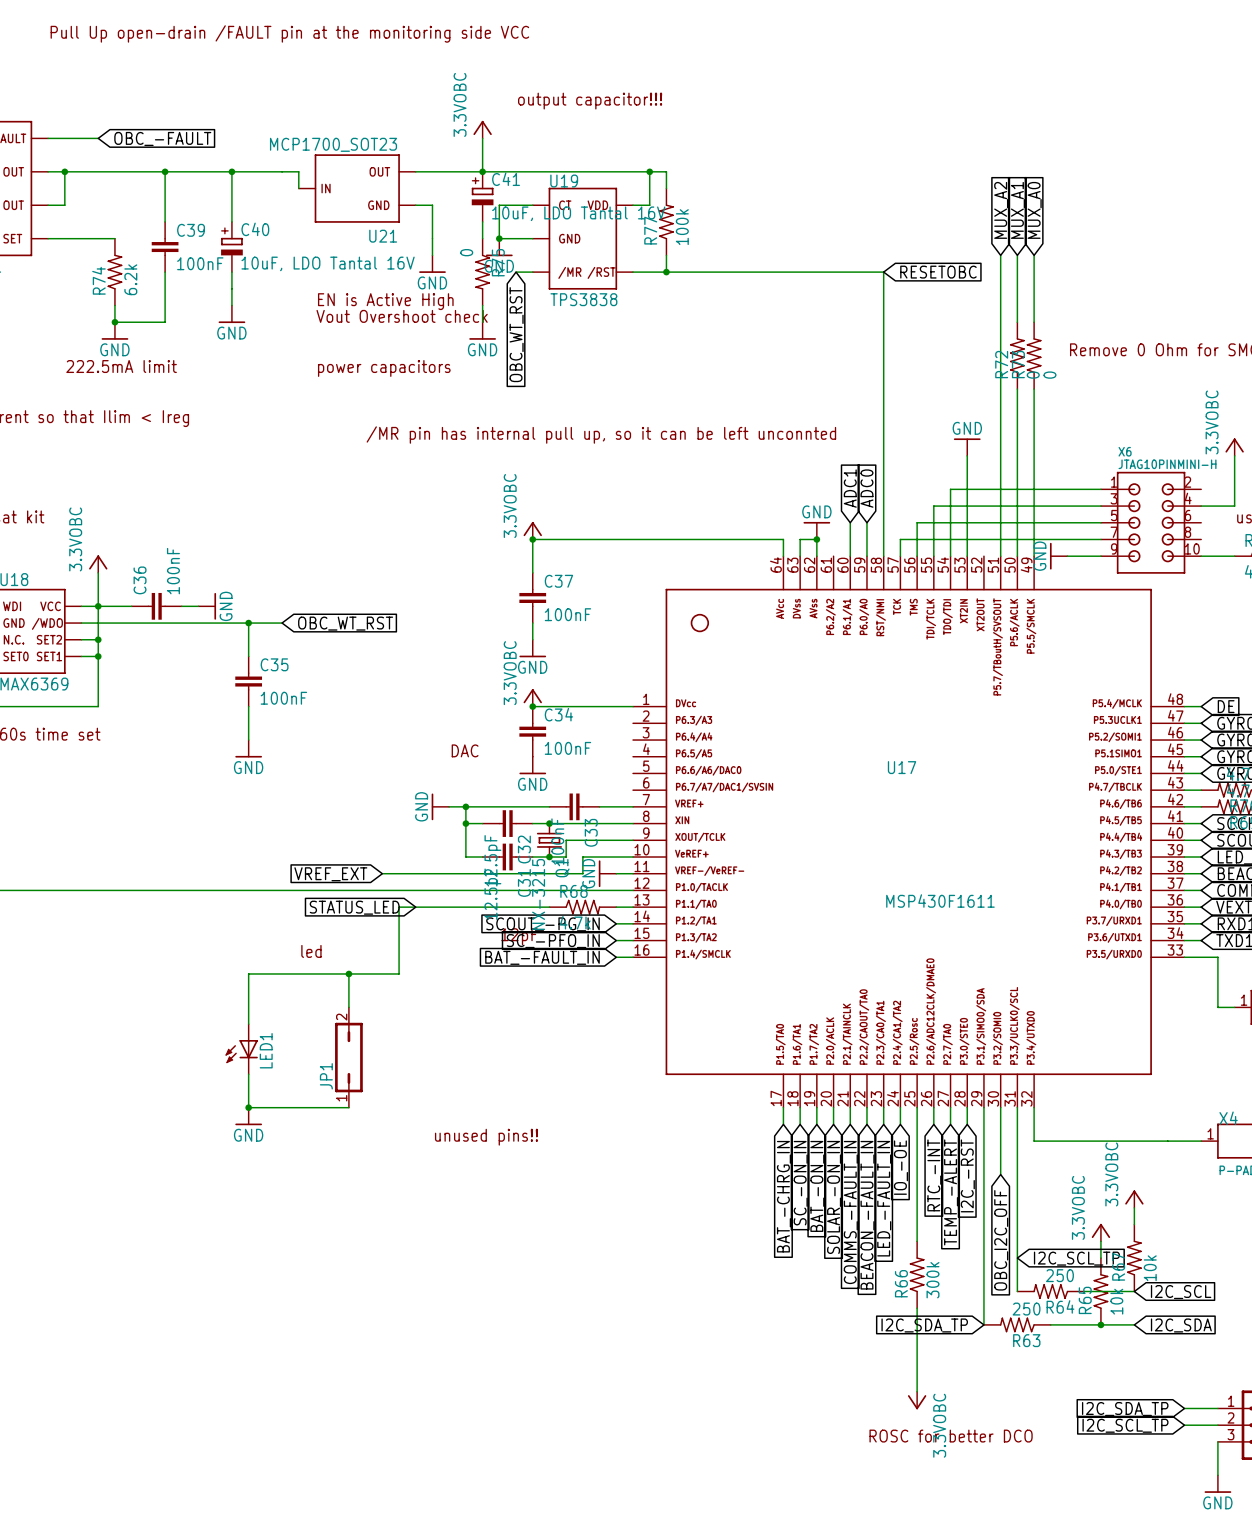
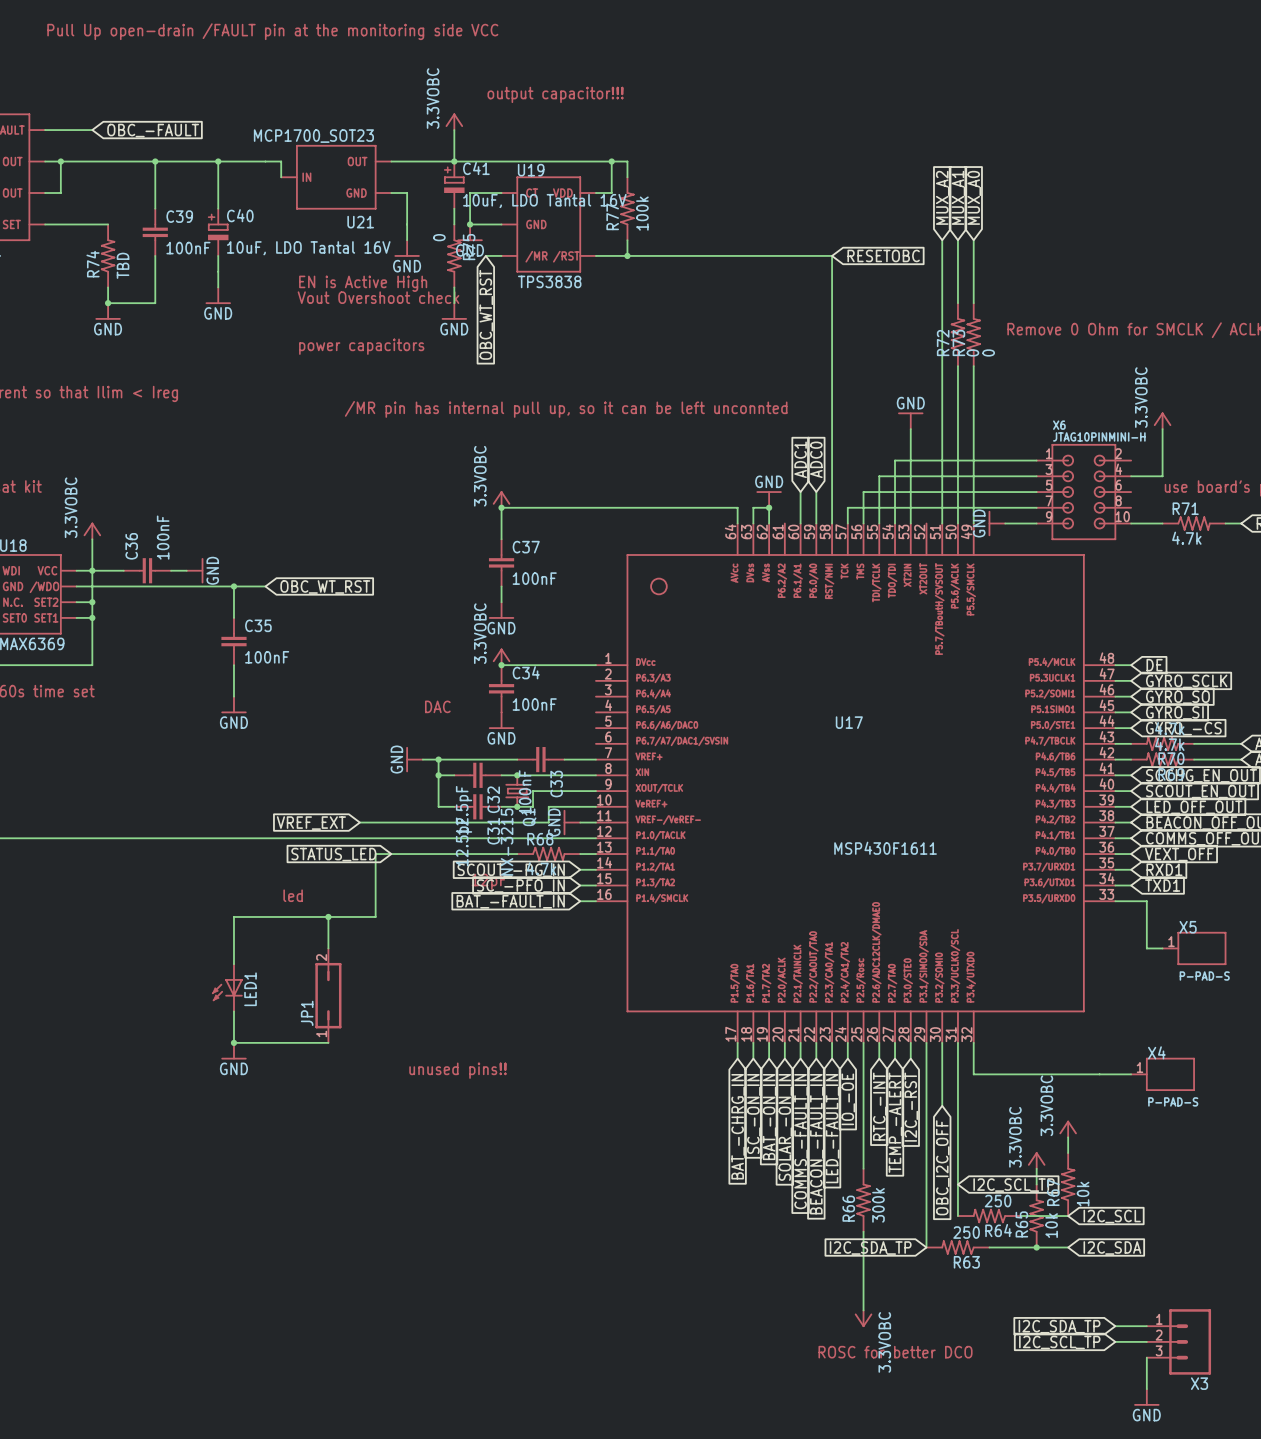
R74 value: 6.2k (130, 279) -> TBD (123, 265)
text: 222.5mA limit (121, 366) -> none

